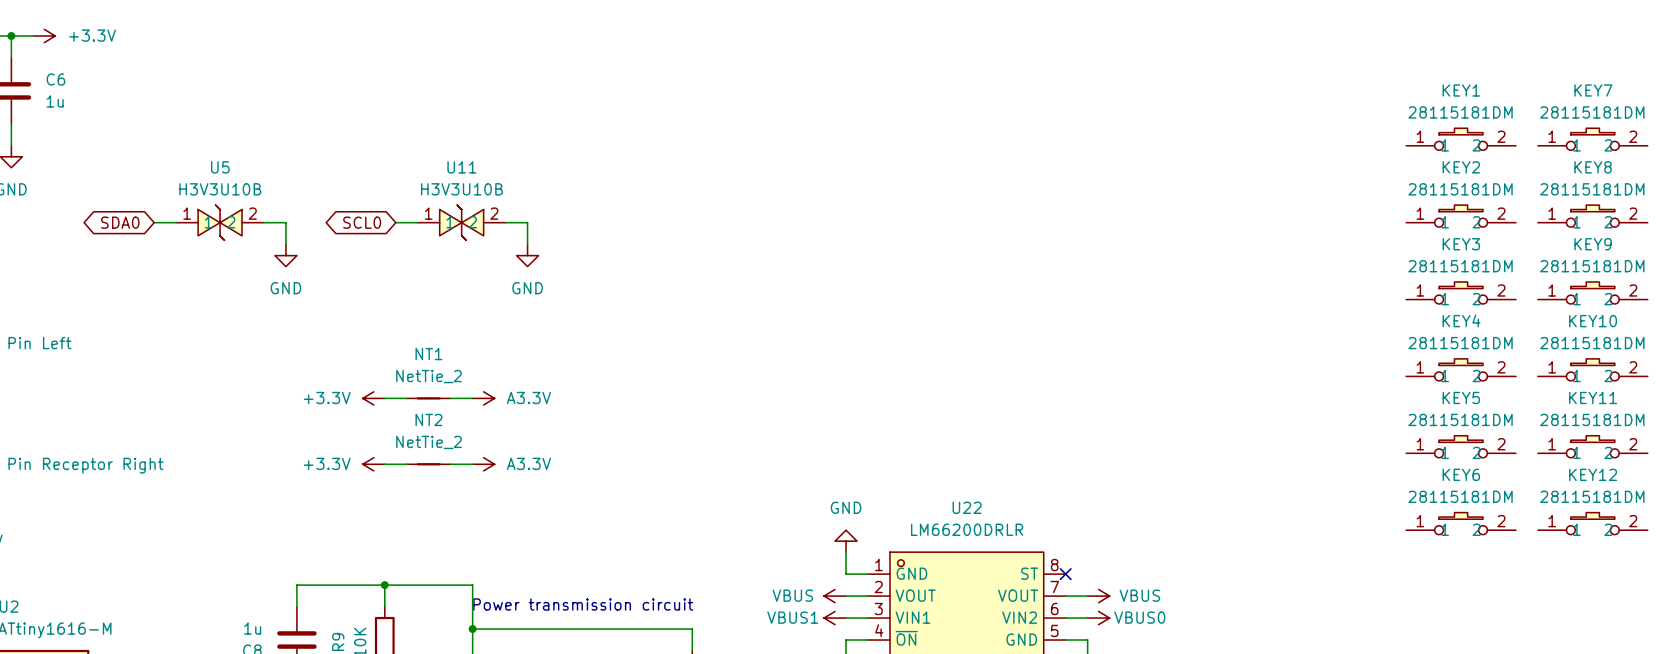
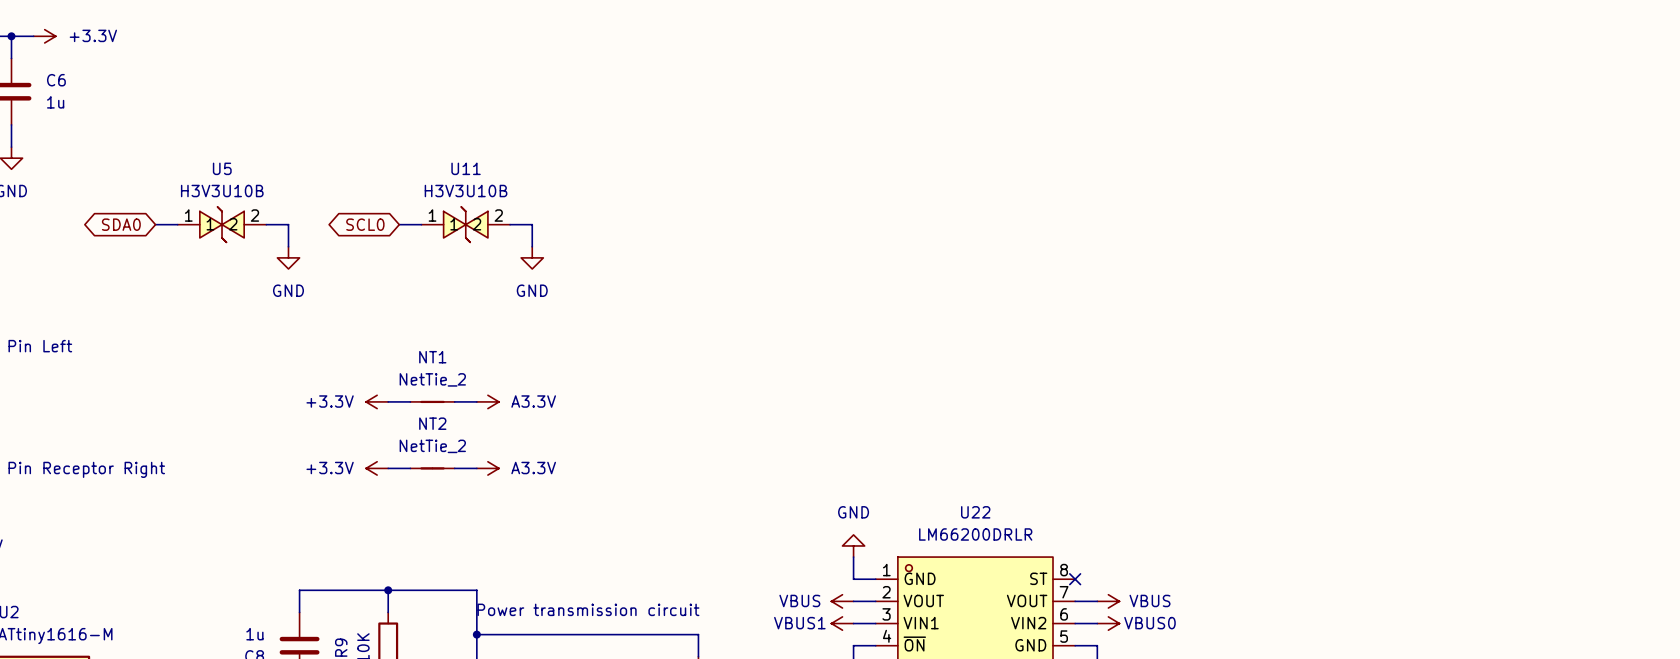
KEY1: 28115181DM (1461, 139) -> none
KEY7: 28115181DM (1592, 139) -> none
KEY2: 28115181DM (1461, 216) -> none
KEY8: 28115181DM (1592, 216) -> none
KEY3: 28115181DM (1461, 292) -> none
KEY9: 28115181DM (1592, 292) -> none
KEY4: 28115181DM (1461, 369) -> none
KEY10: 28115181DM (1592, 369) -> none
KEY5: 28115181DM (1461, 446) -> none
KEY11: 28115181DM (1592, 446) -> none
KEY6: 28115181DM (1461, 523) -> none
KEY12: 28115181DM (1592, 523) -> none

